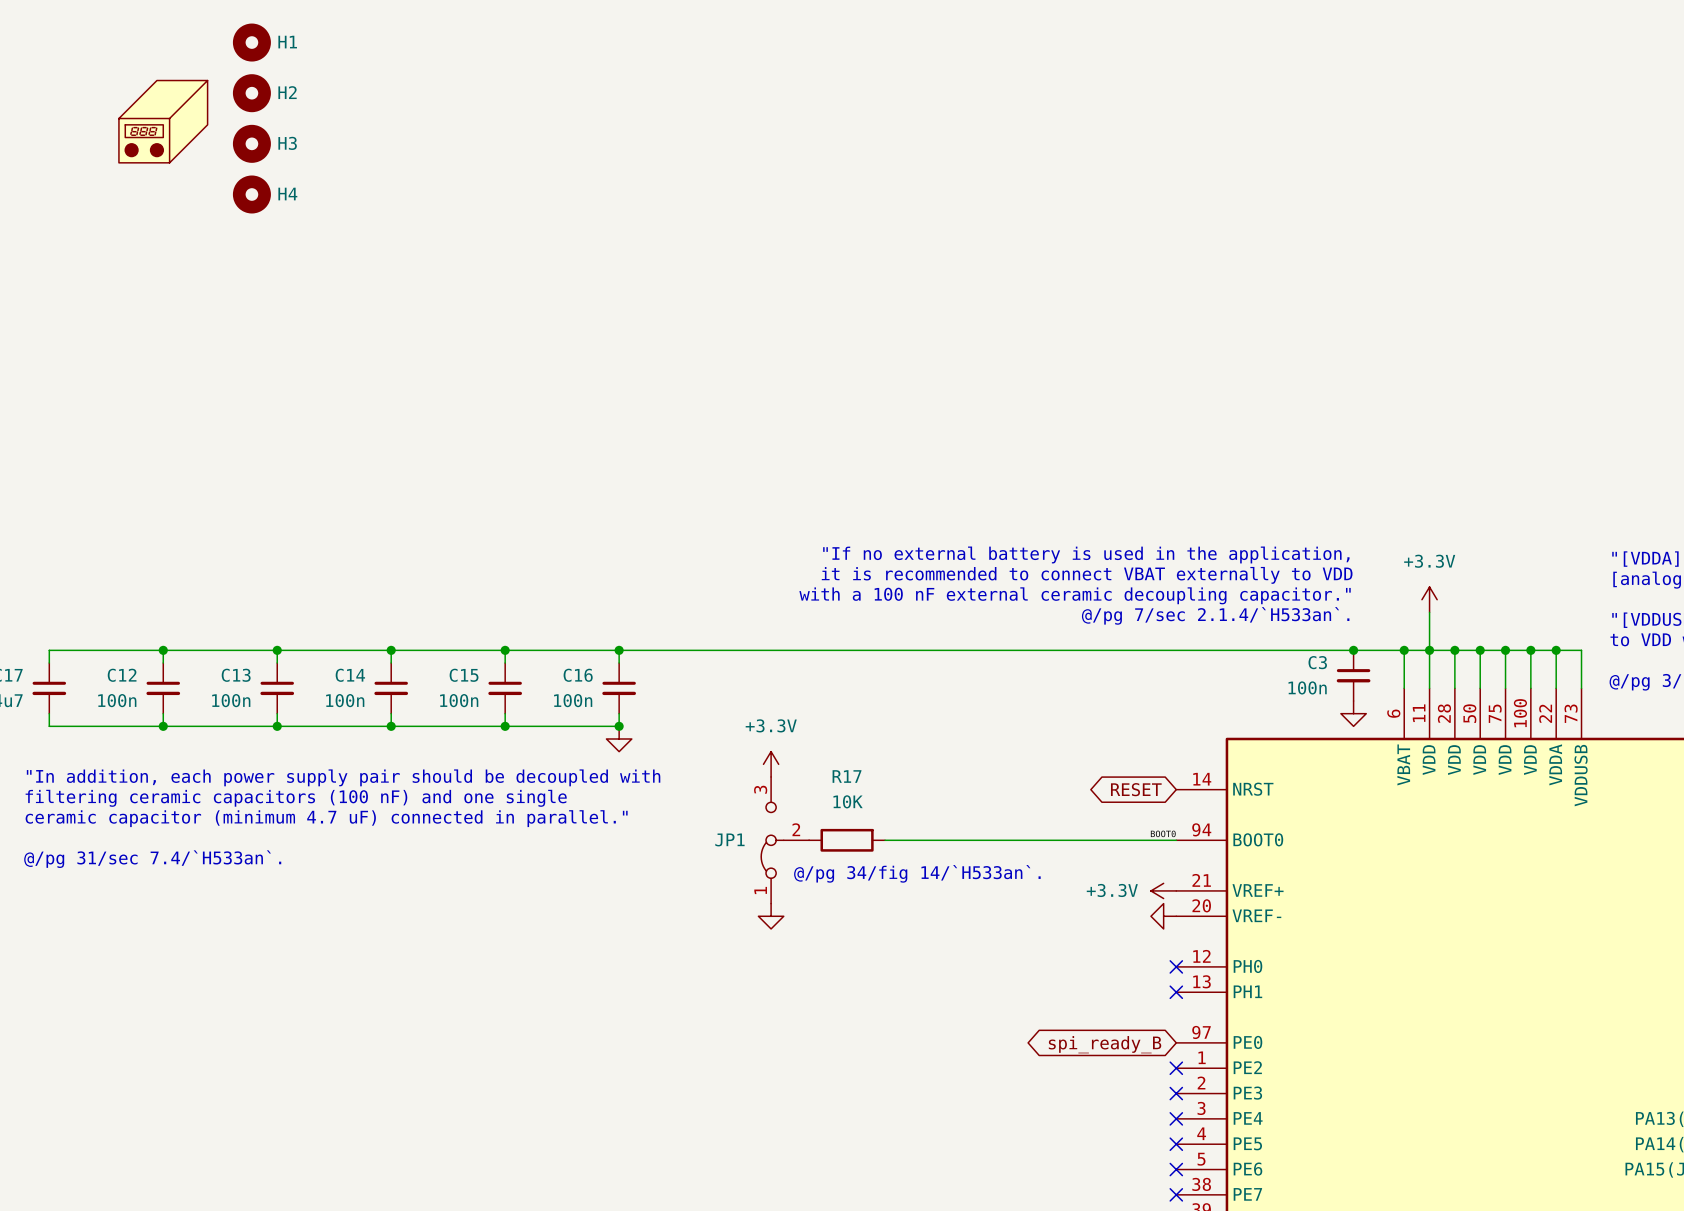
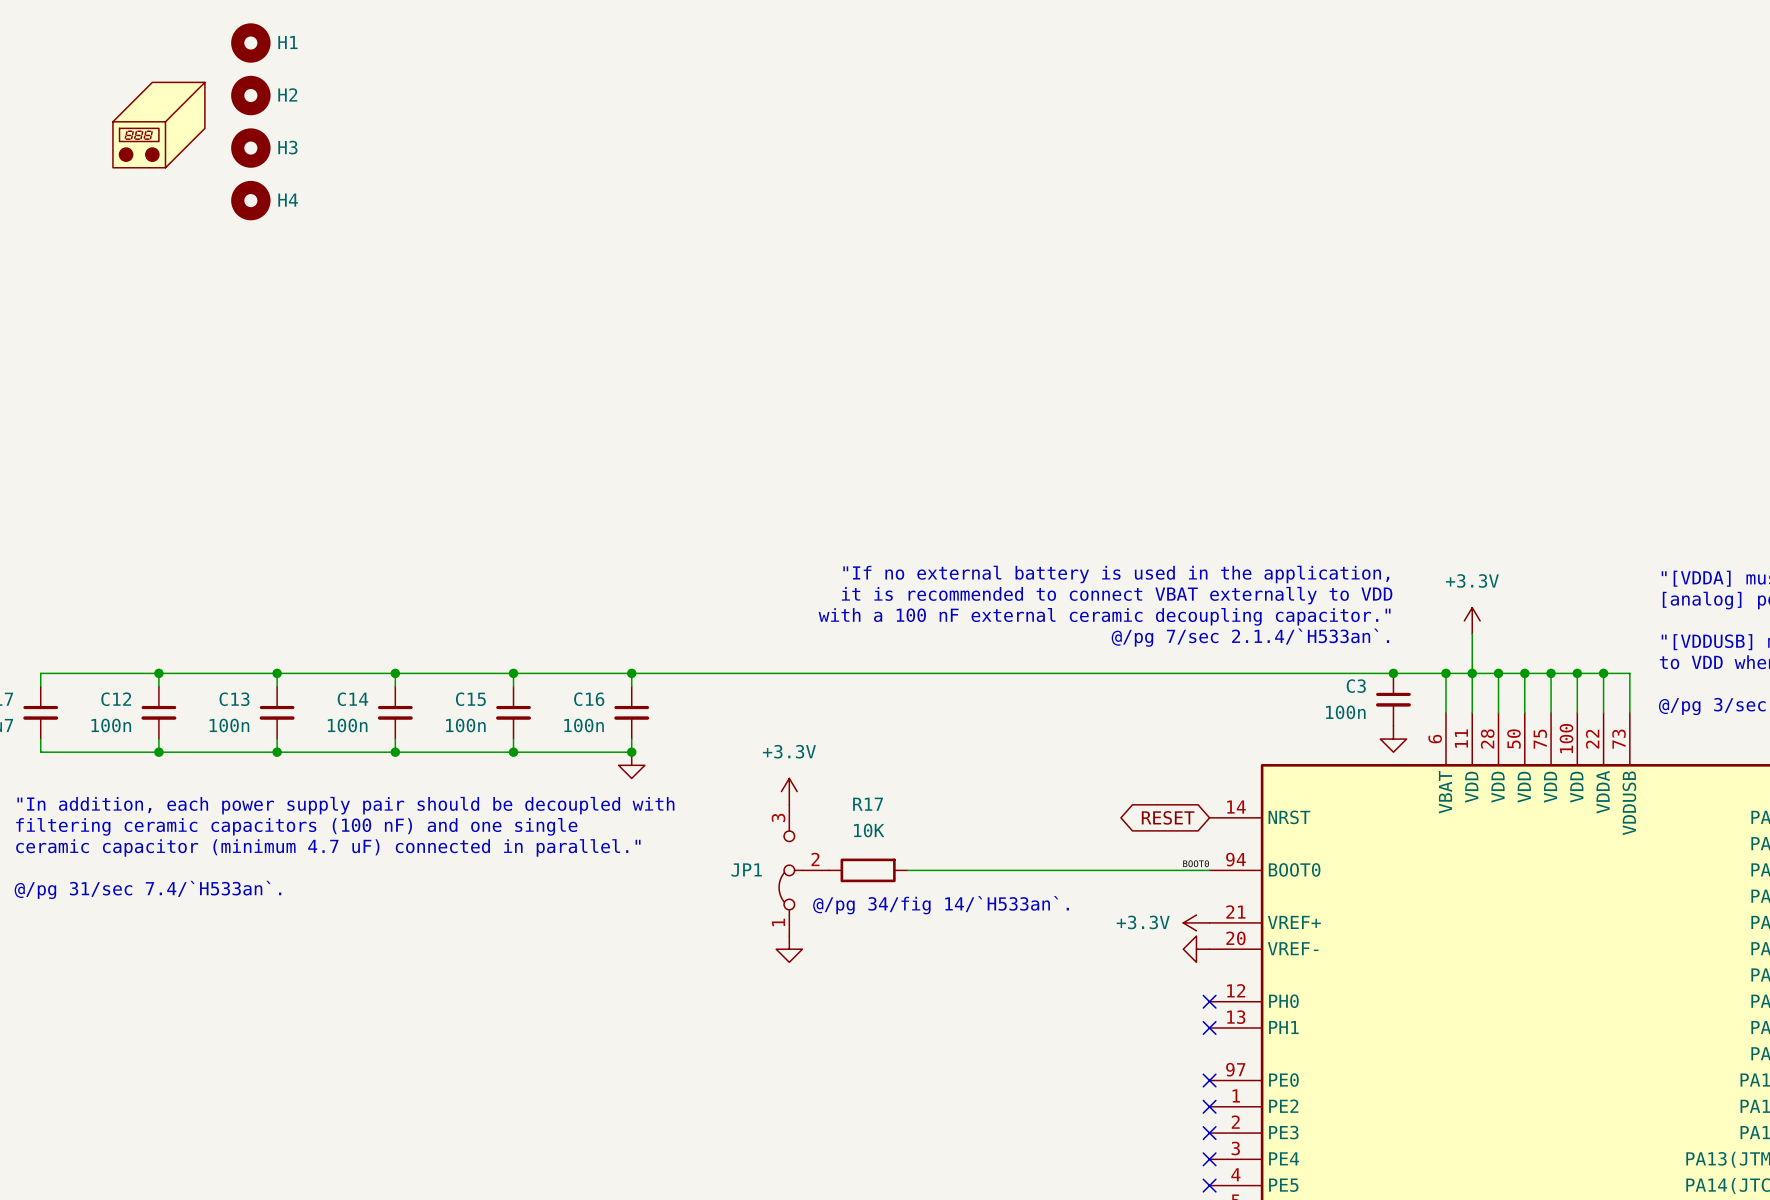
no-connect mark: none -> (1209, 1080)
global label: spi_ready_B (1105, 1044) -> none

